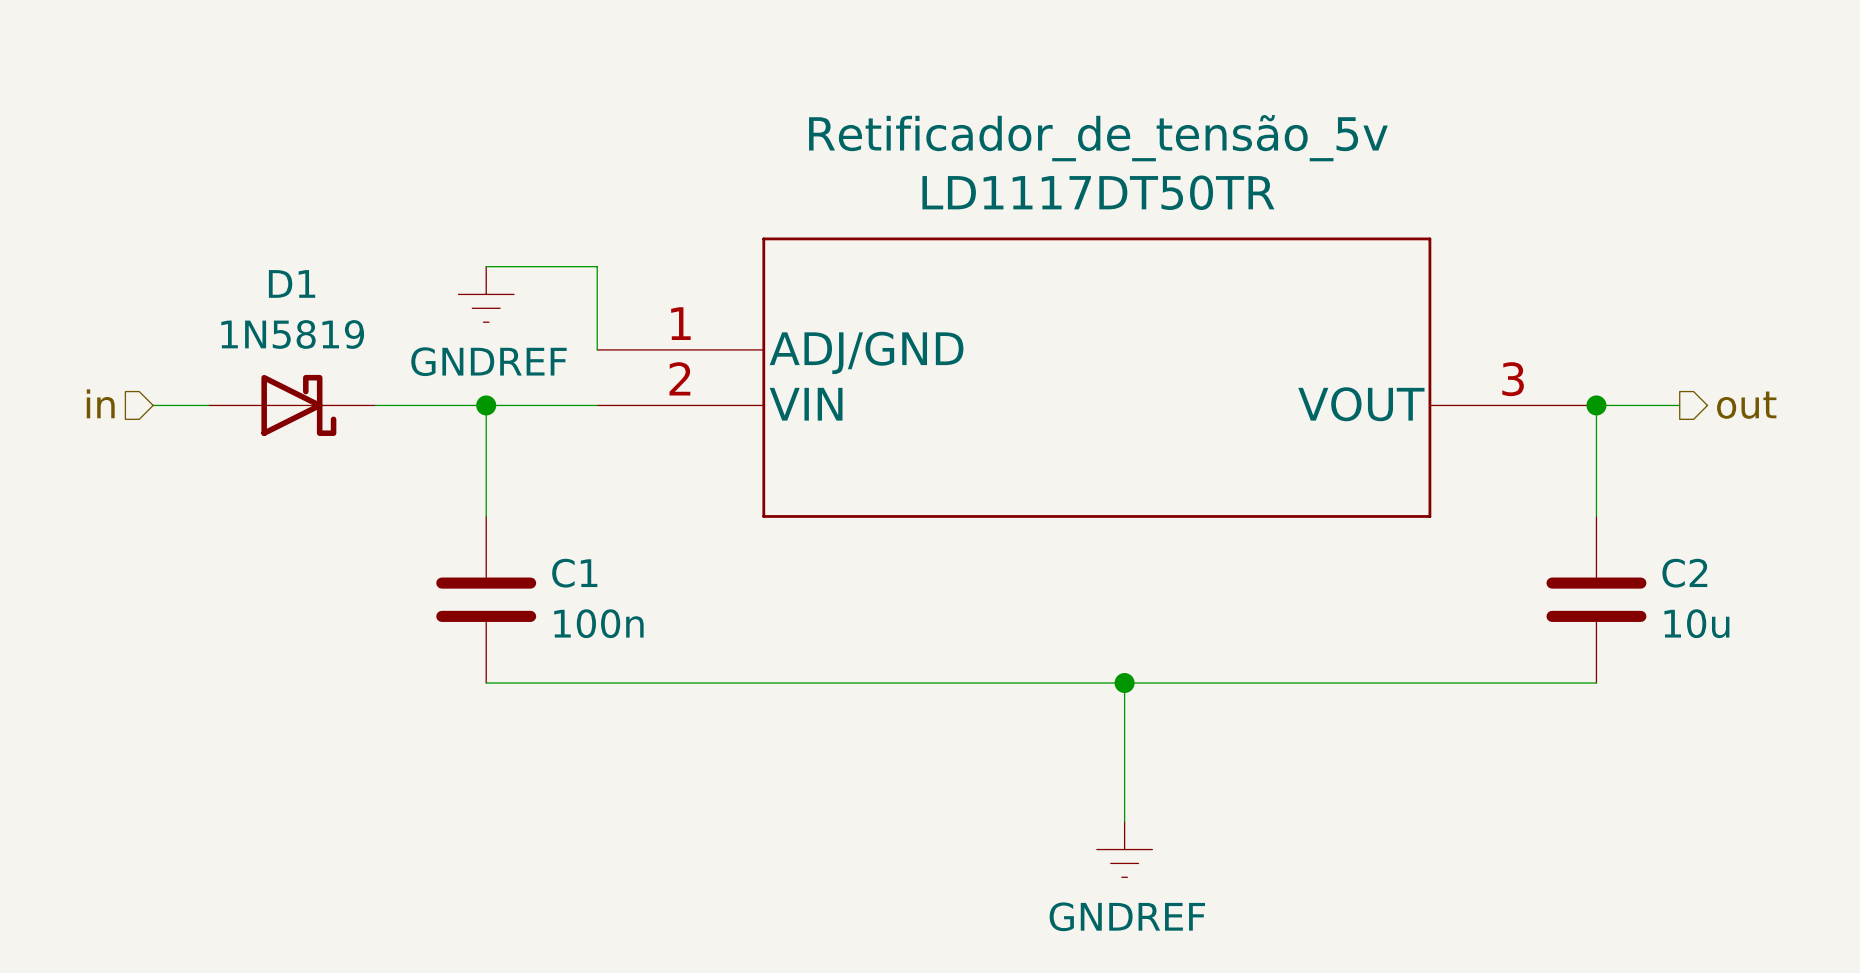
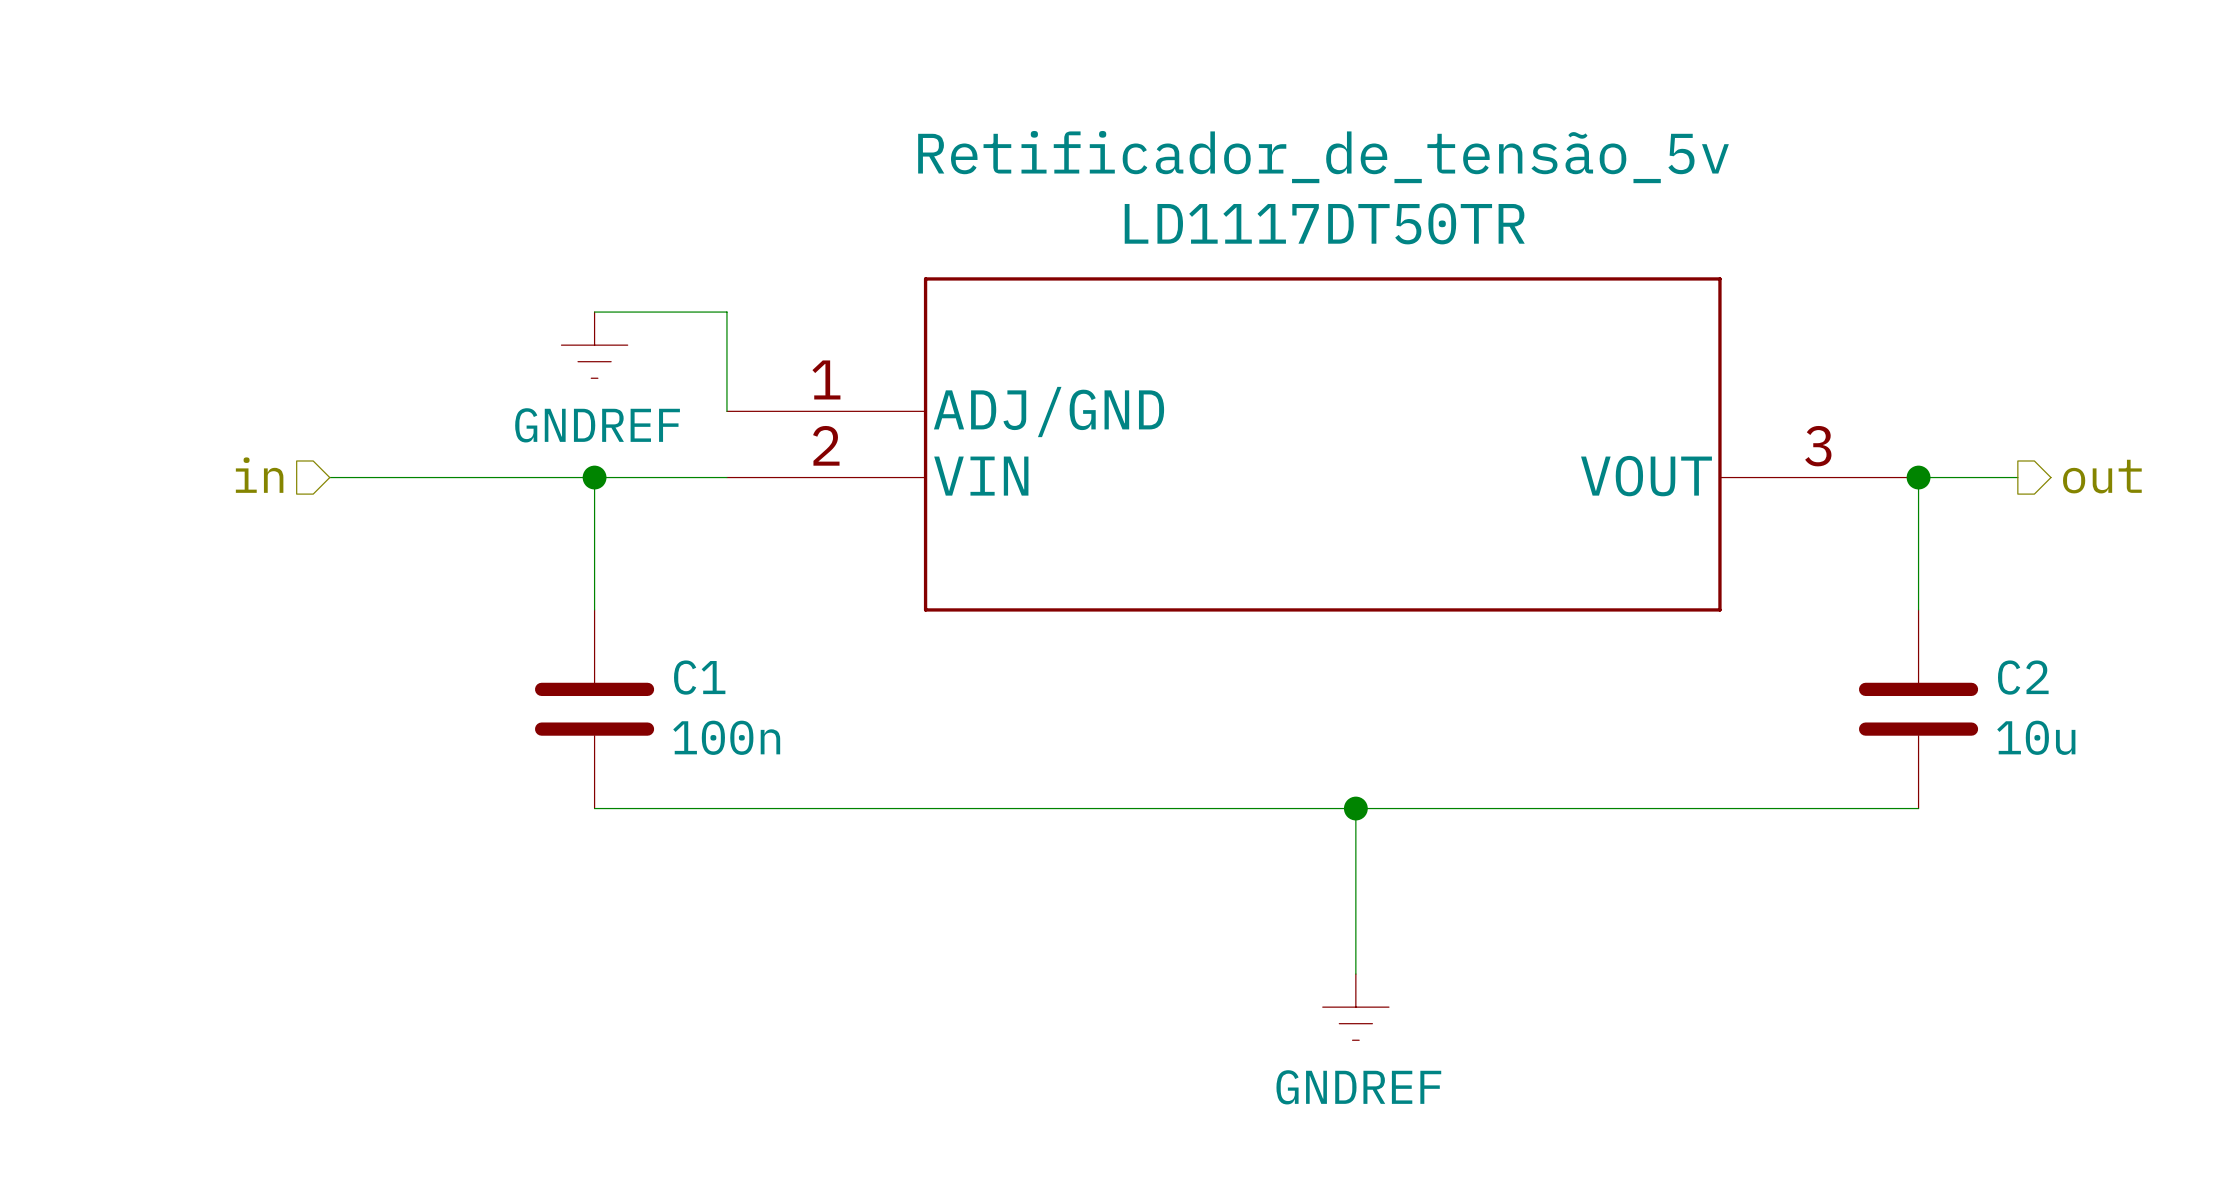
hierarchical label position: in (100, 403) -> in (259, 475)
wire: (153, 405) (208, 405) -> none
D1: 1N5819 (291, 405) -> none

